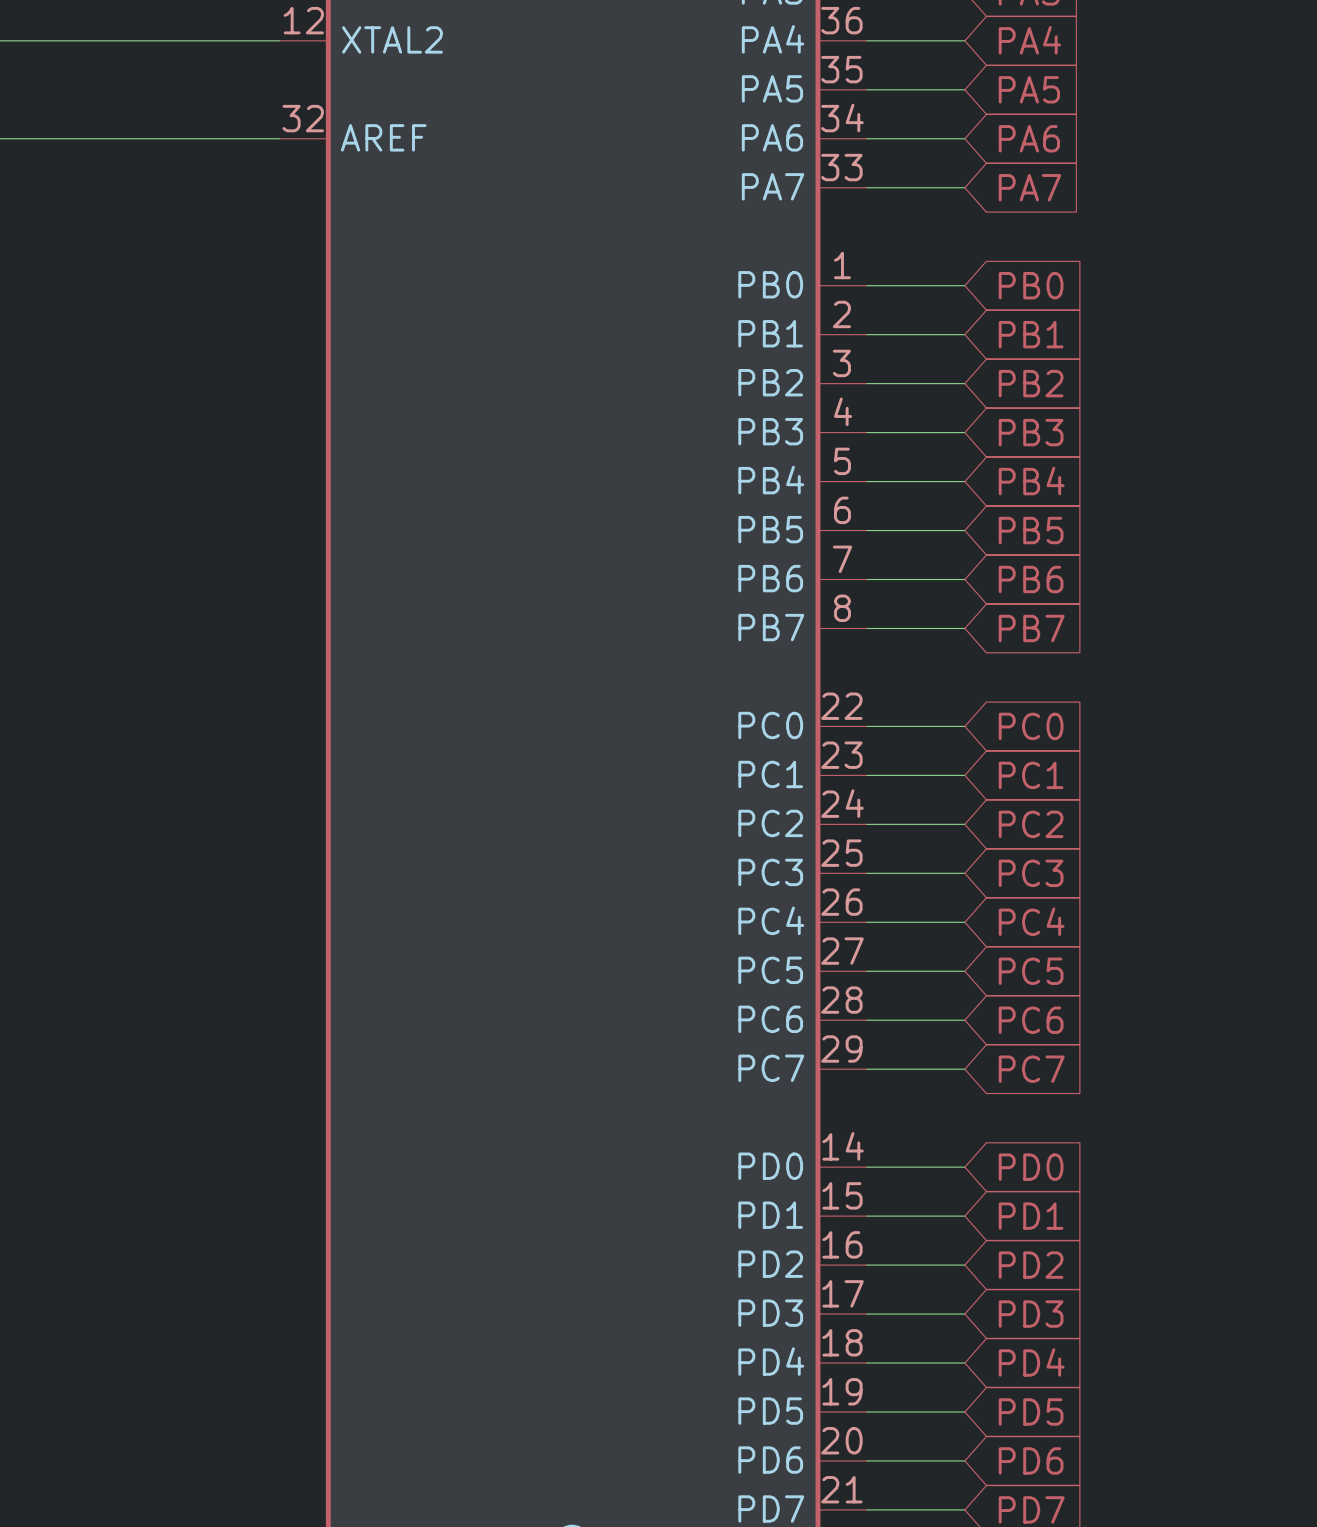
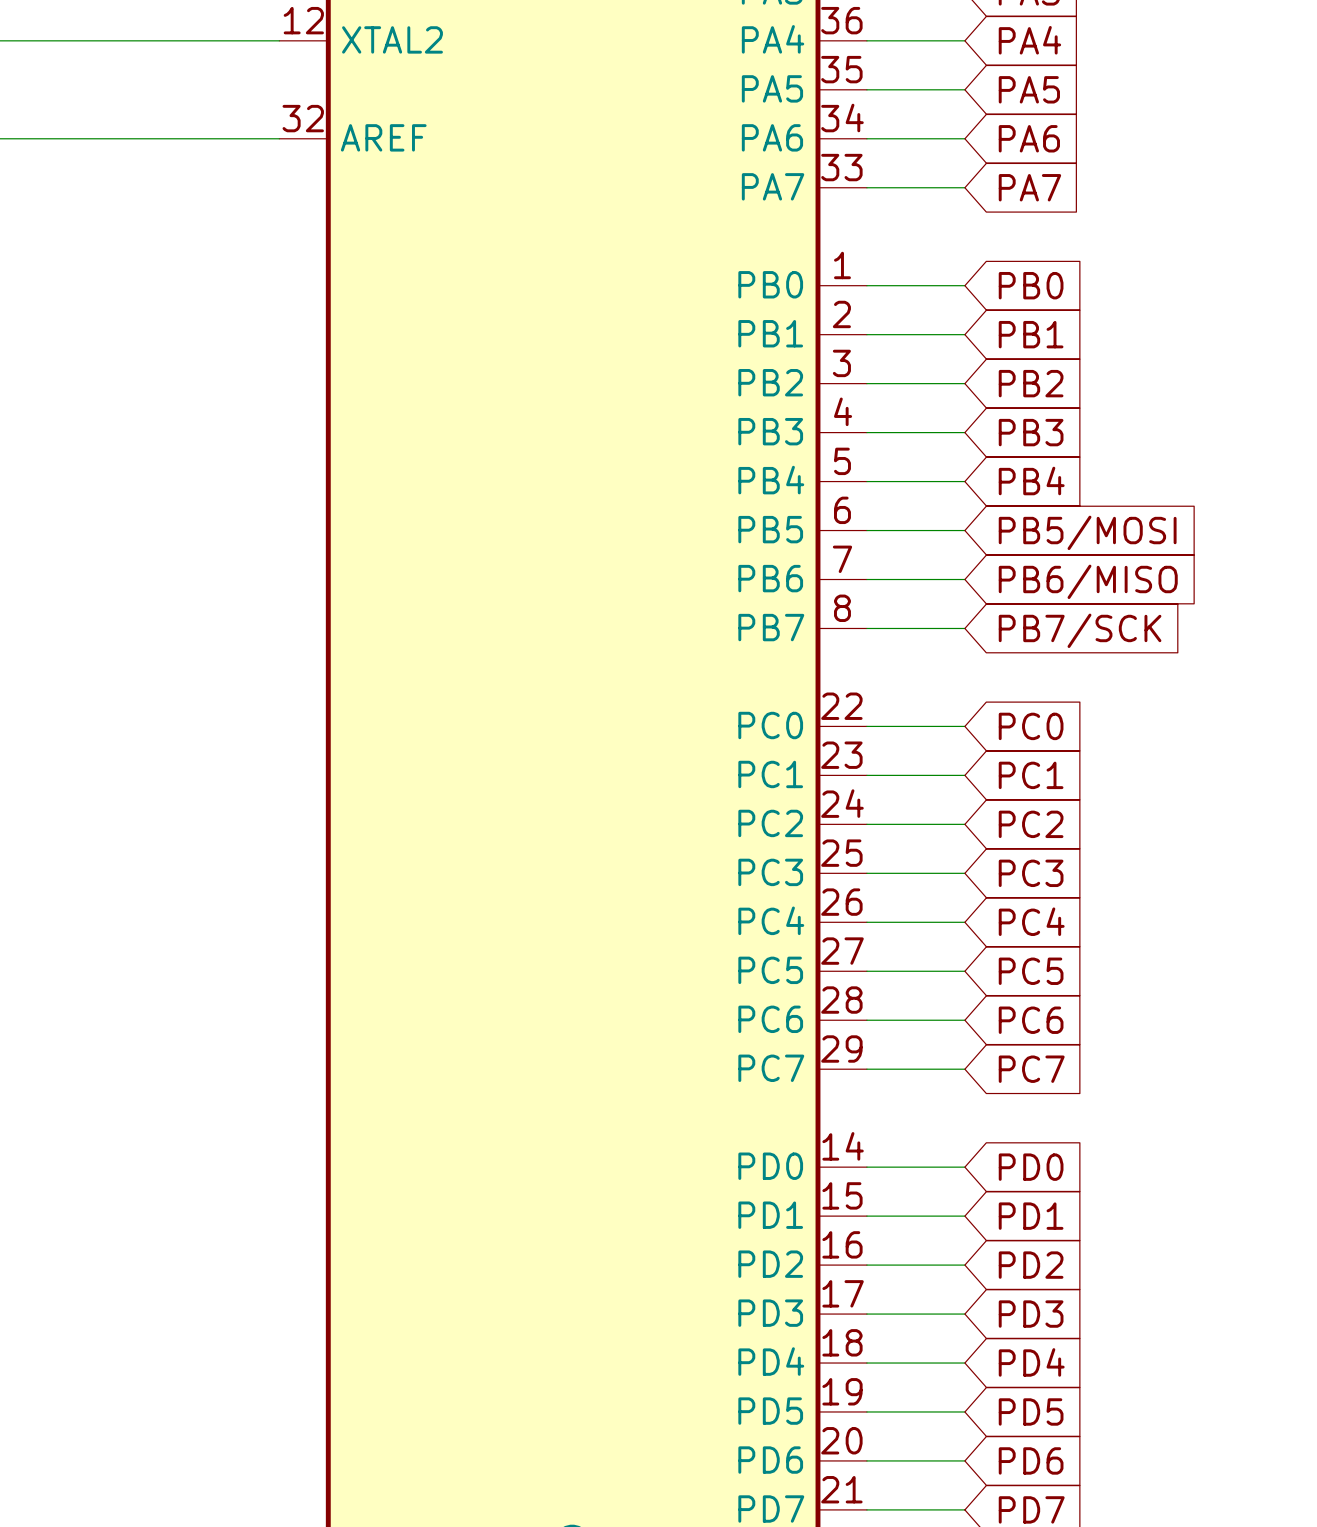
global label: PB5 (1031, 530) -> PB5/MOSI (1087, 532)
global label: PB6 (1031, 579) -> PB6/MISO (1088, 581)
global label: PB7 (1031, 628) -> PB7/SCK (1080, 630)

